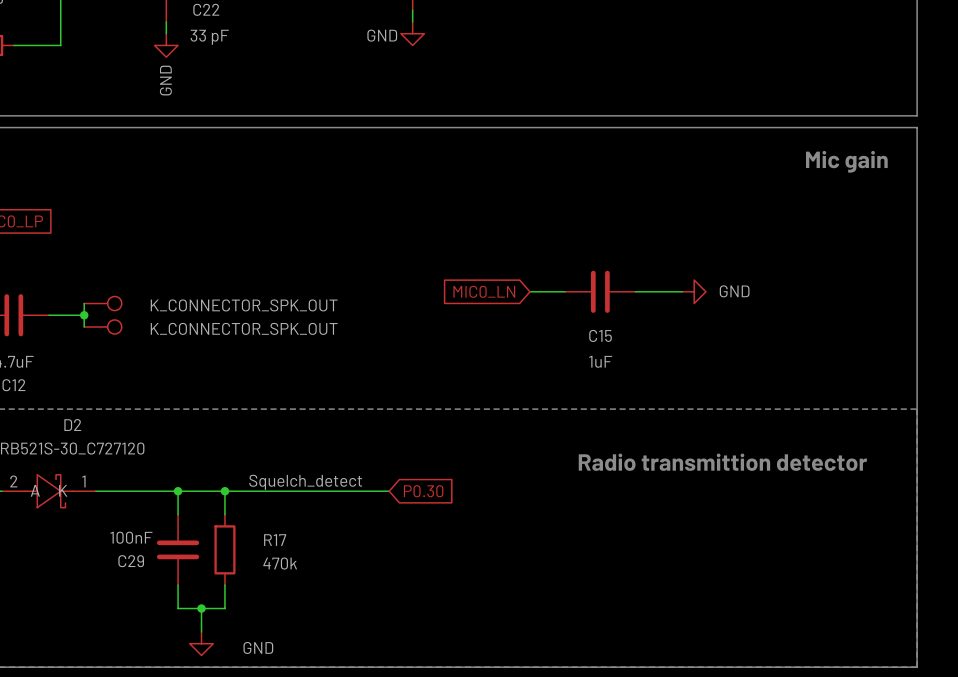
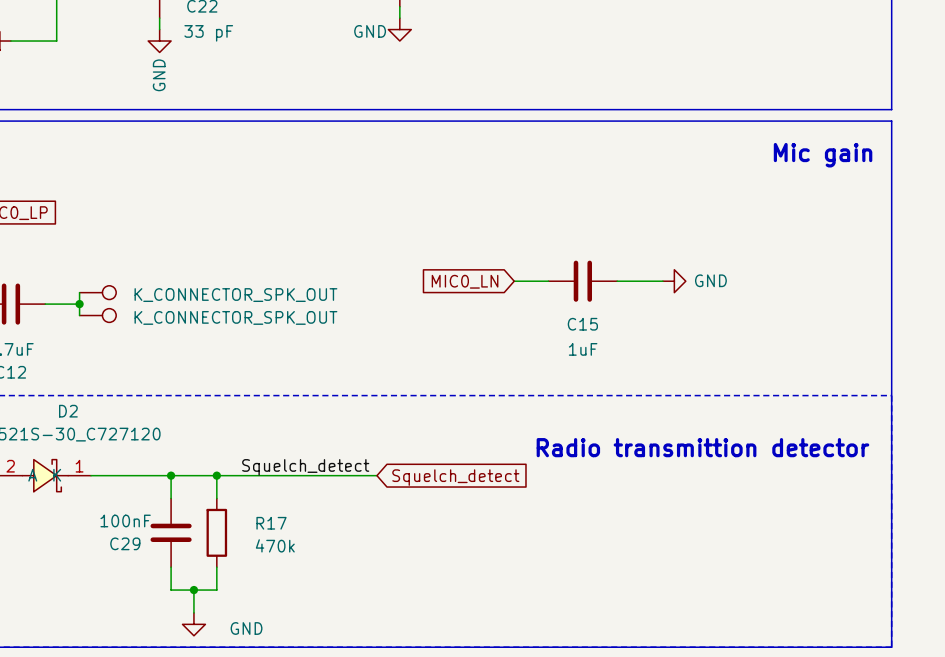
global label: P0.30 (423, 491) -> Squelch_detect (455, 477)

